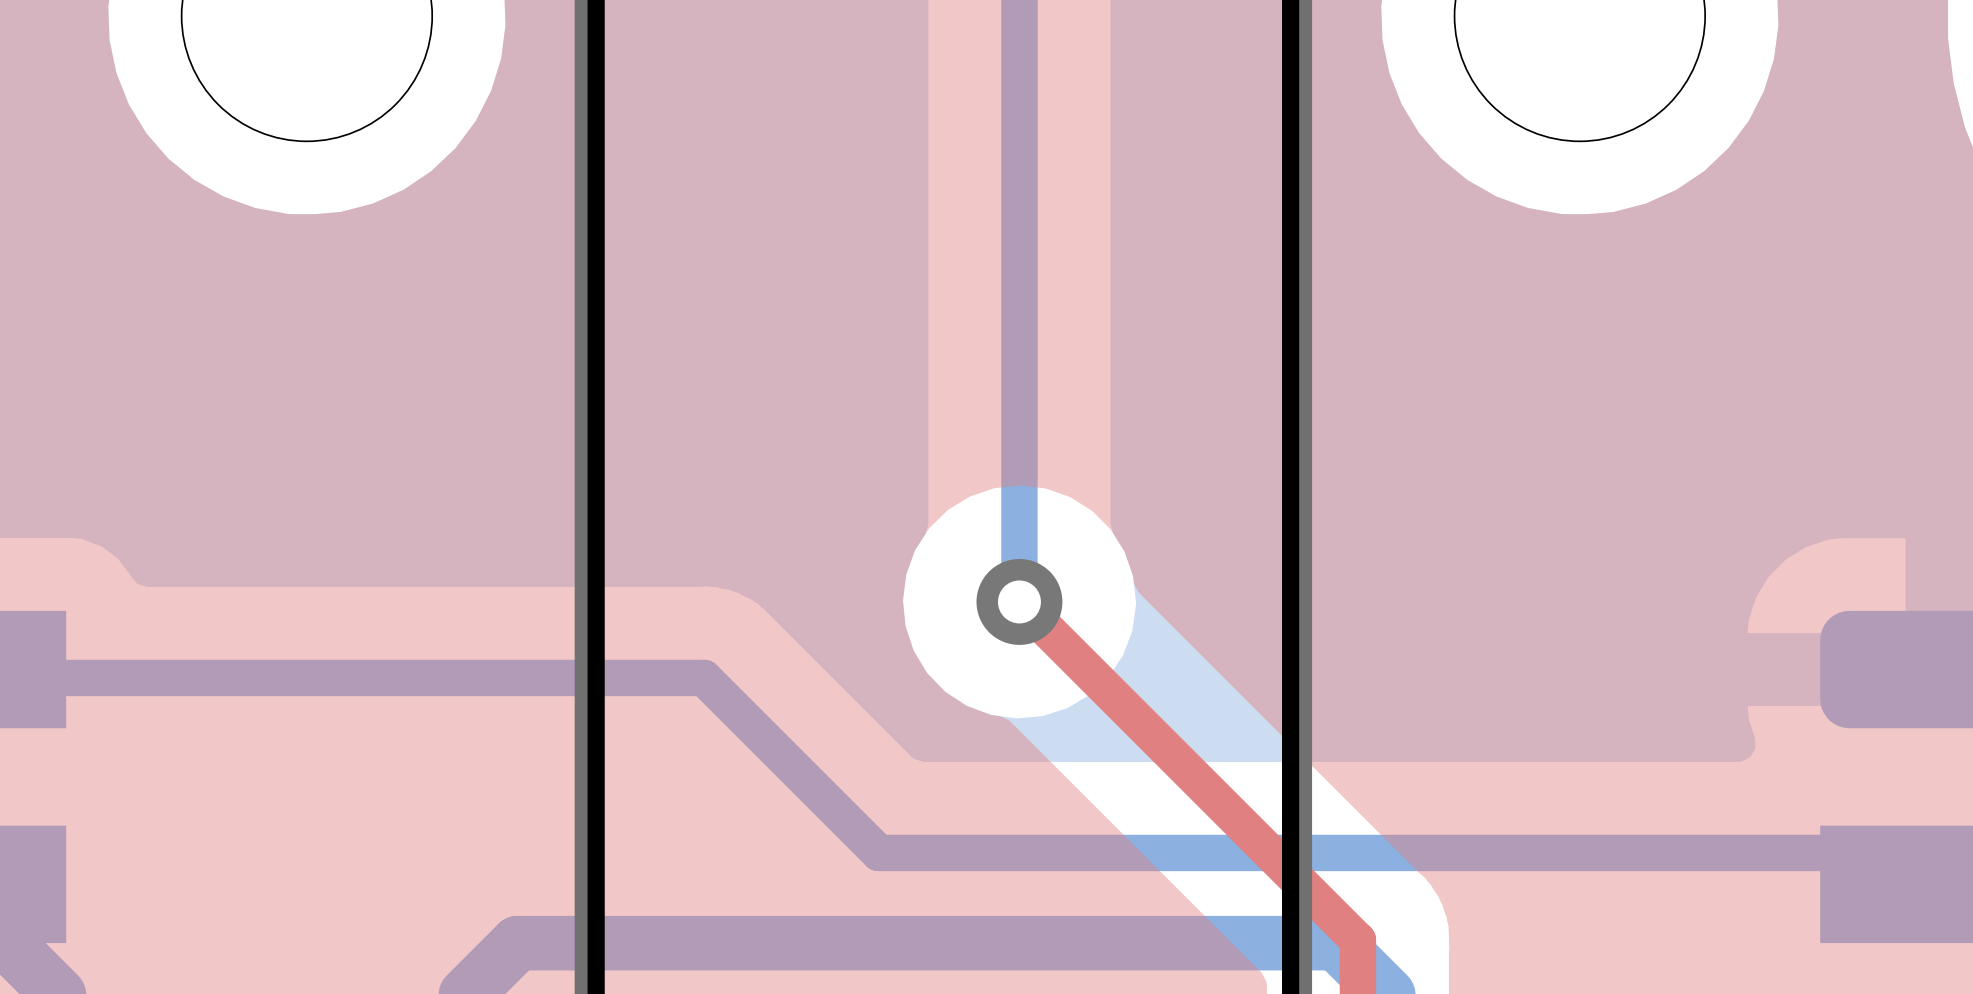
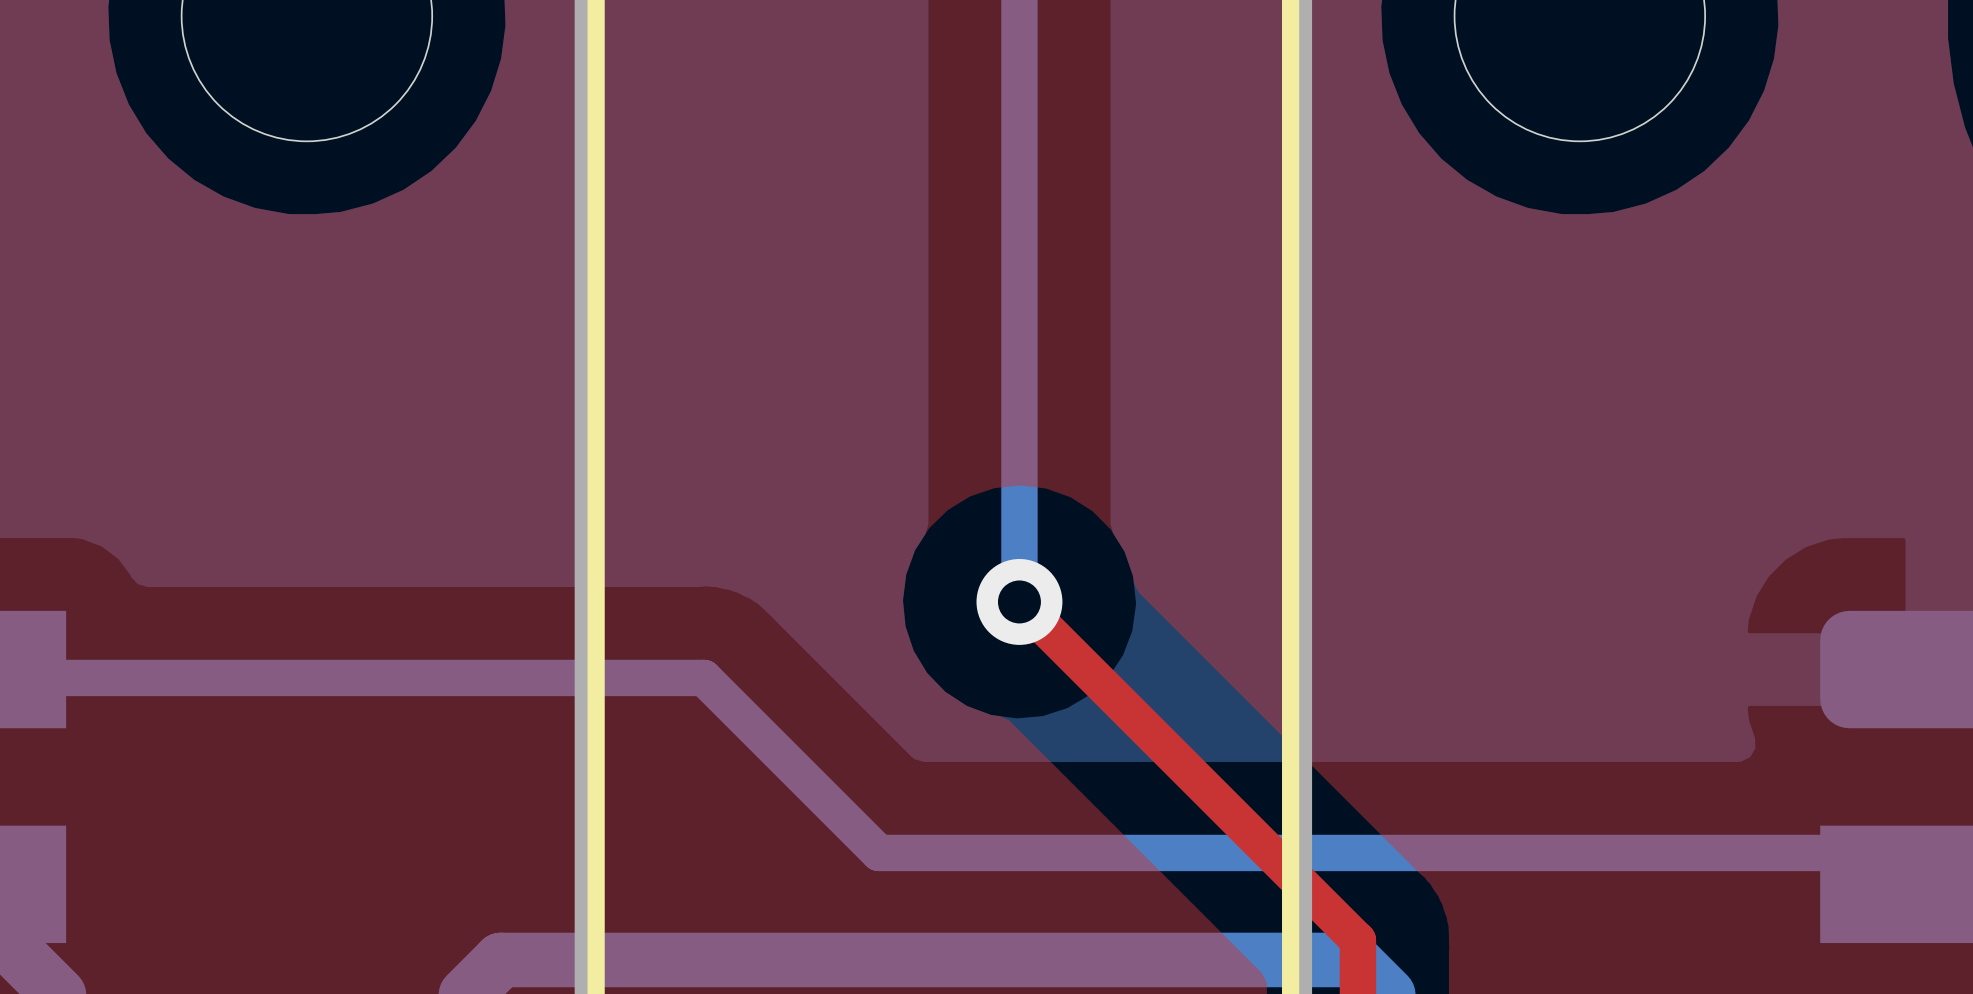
bottom track: (500, 959) (517, 943) (1336, 943) (1353, 959) -> (500, 959) (1353, 959)

